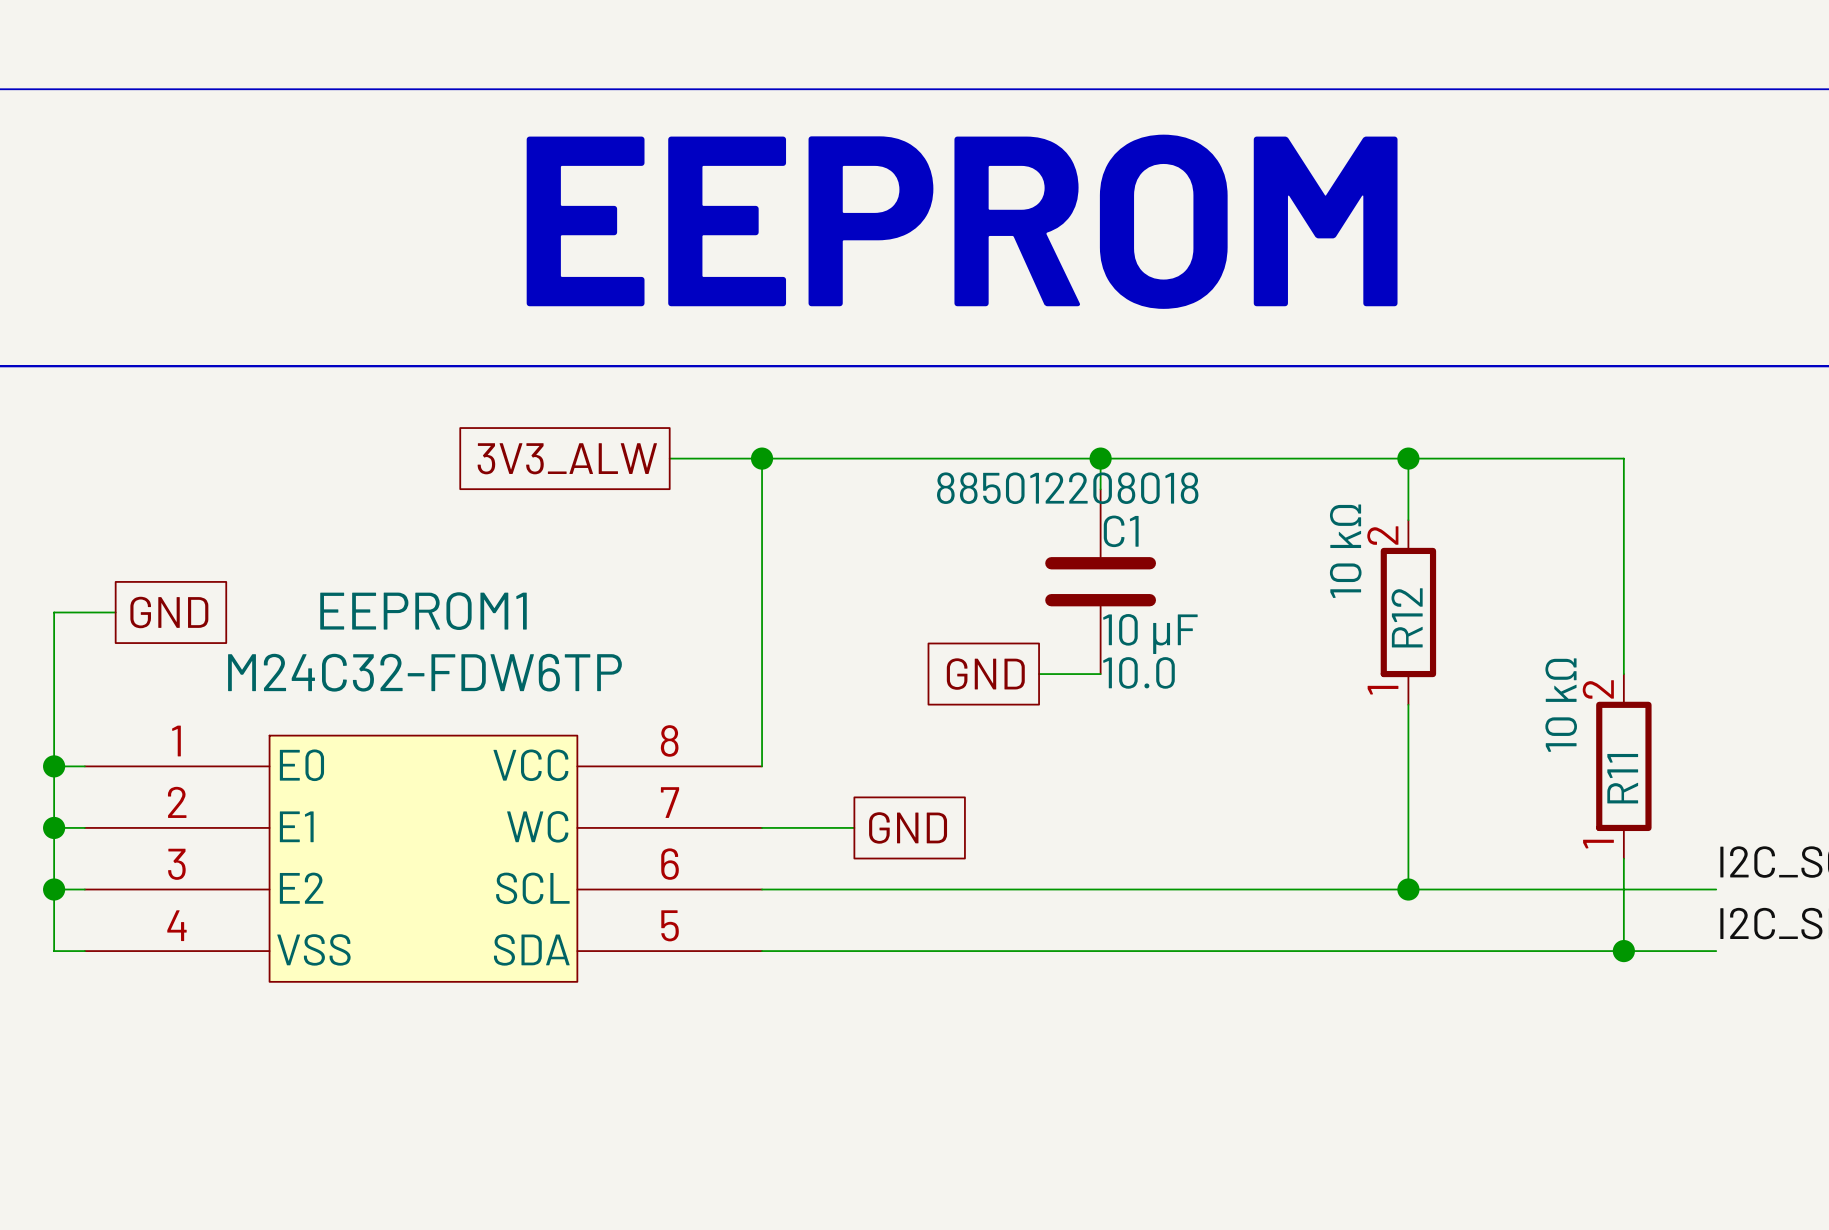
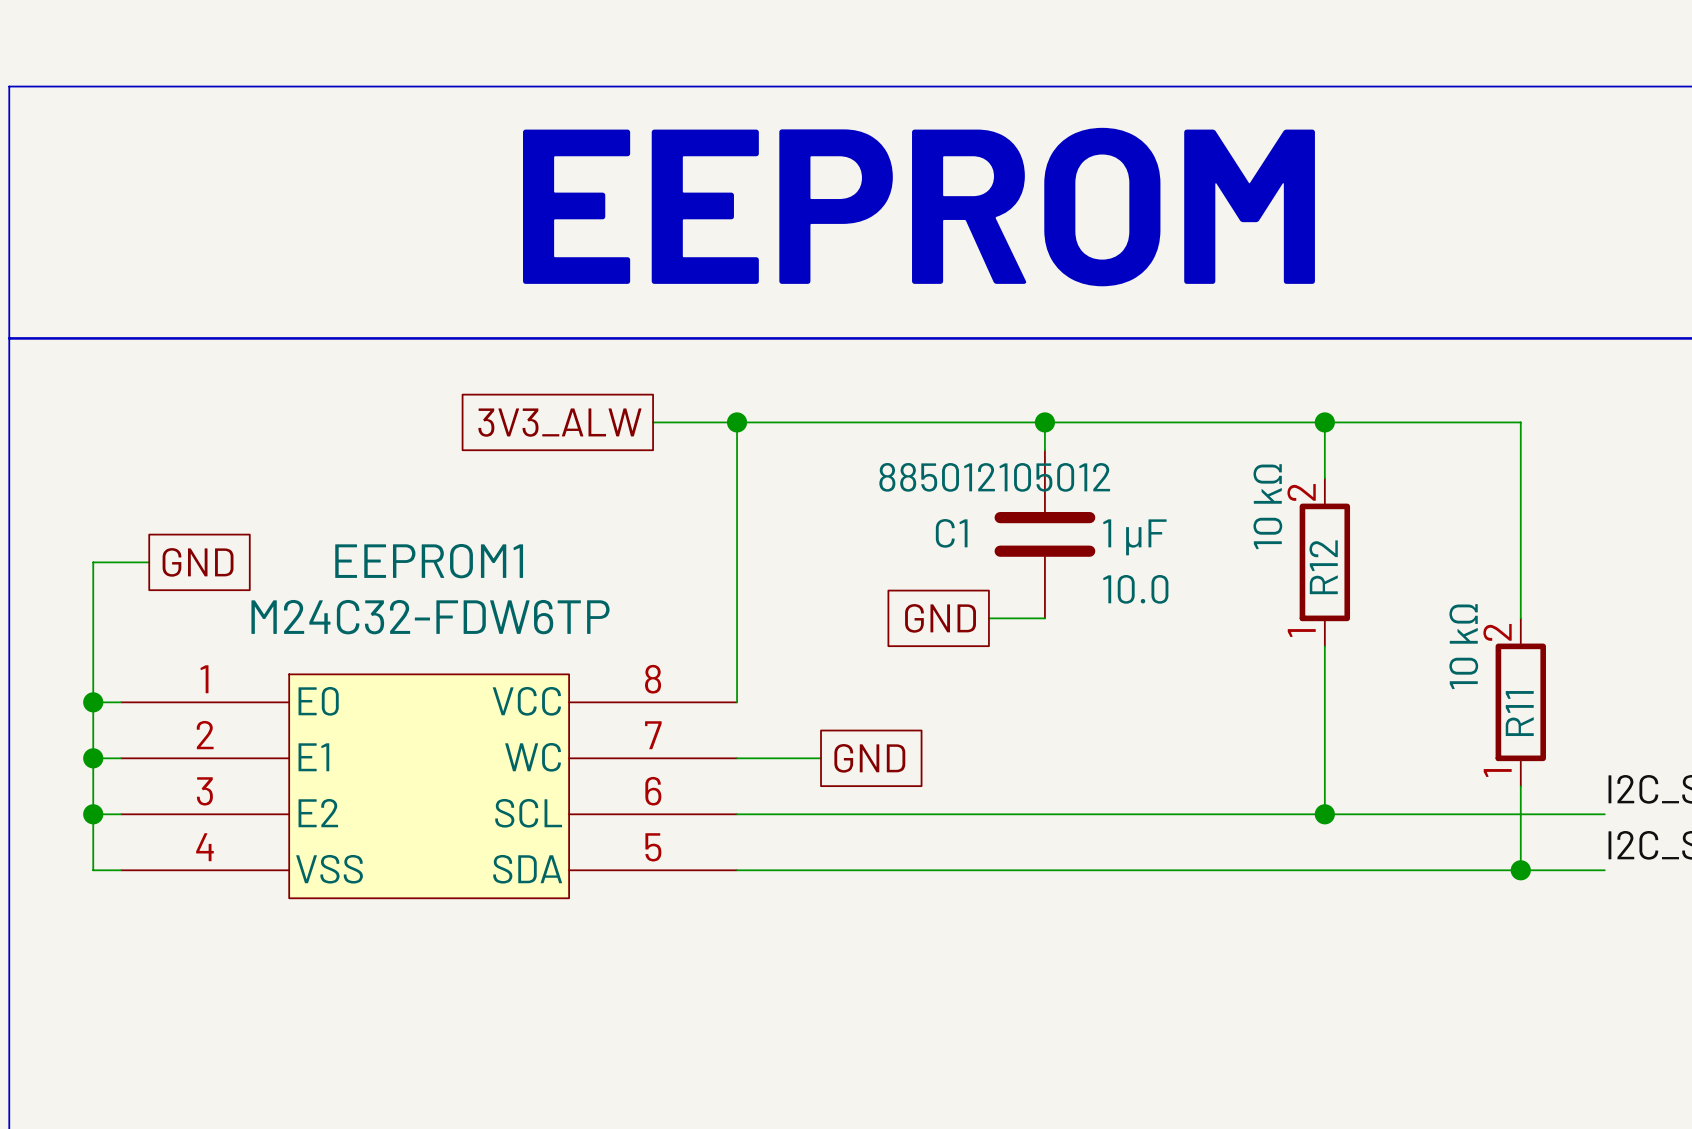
C1 text: 885012208018 (1067, 488) -> 885012105012 (994, 477)
C1 name position: C1 (1121, 531) -> C1 (951, 533)
C1 text: 10 µF (1150, 634) -> 1 µF (1134, 537)
C1 text position: 10.0 (1138, 672) -> 10.0 (1135, 589)

